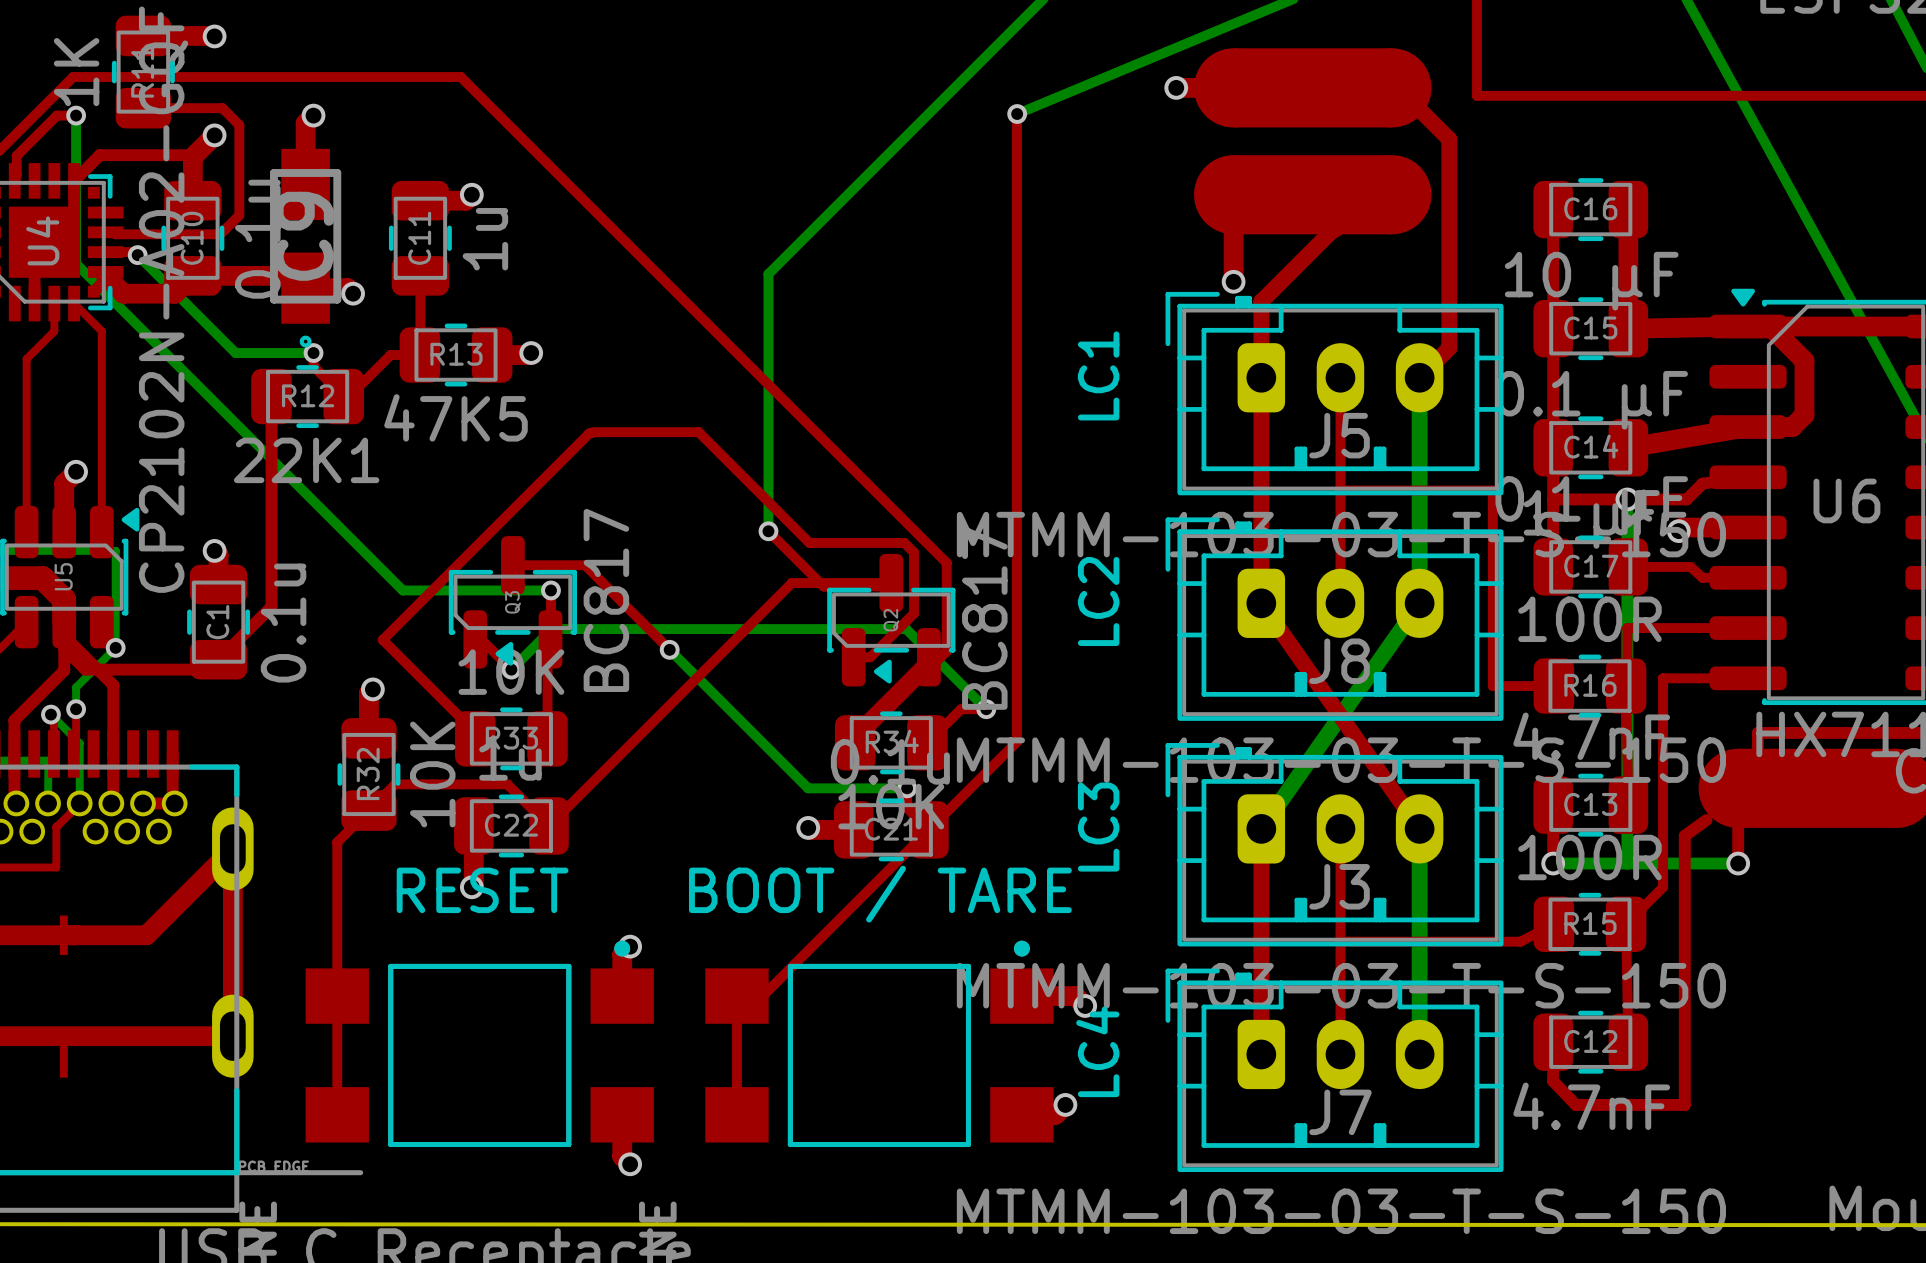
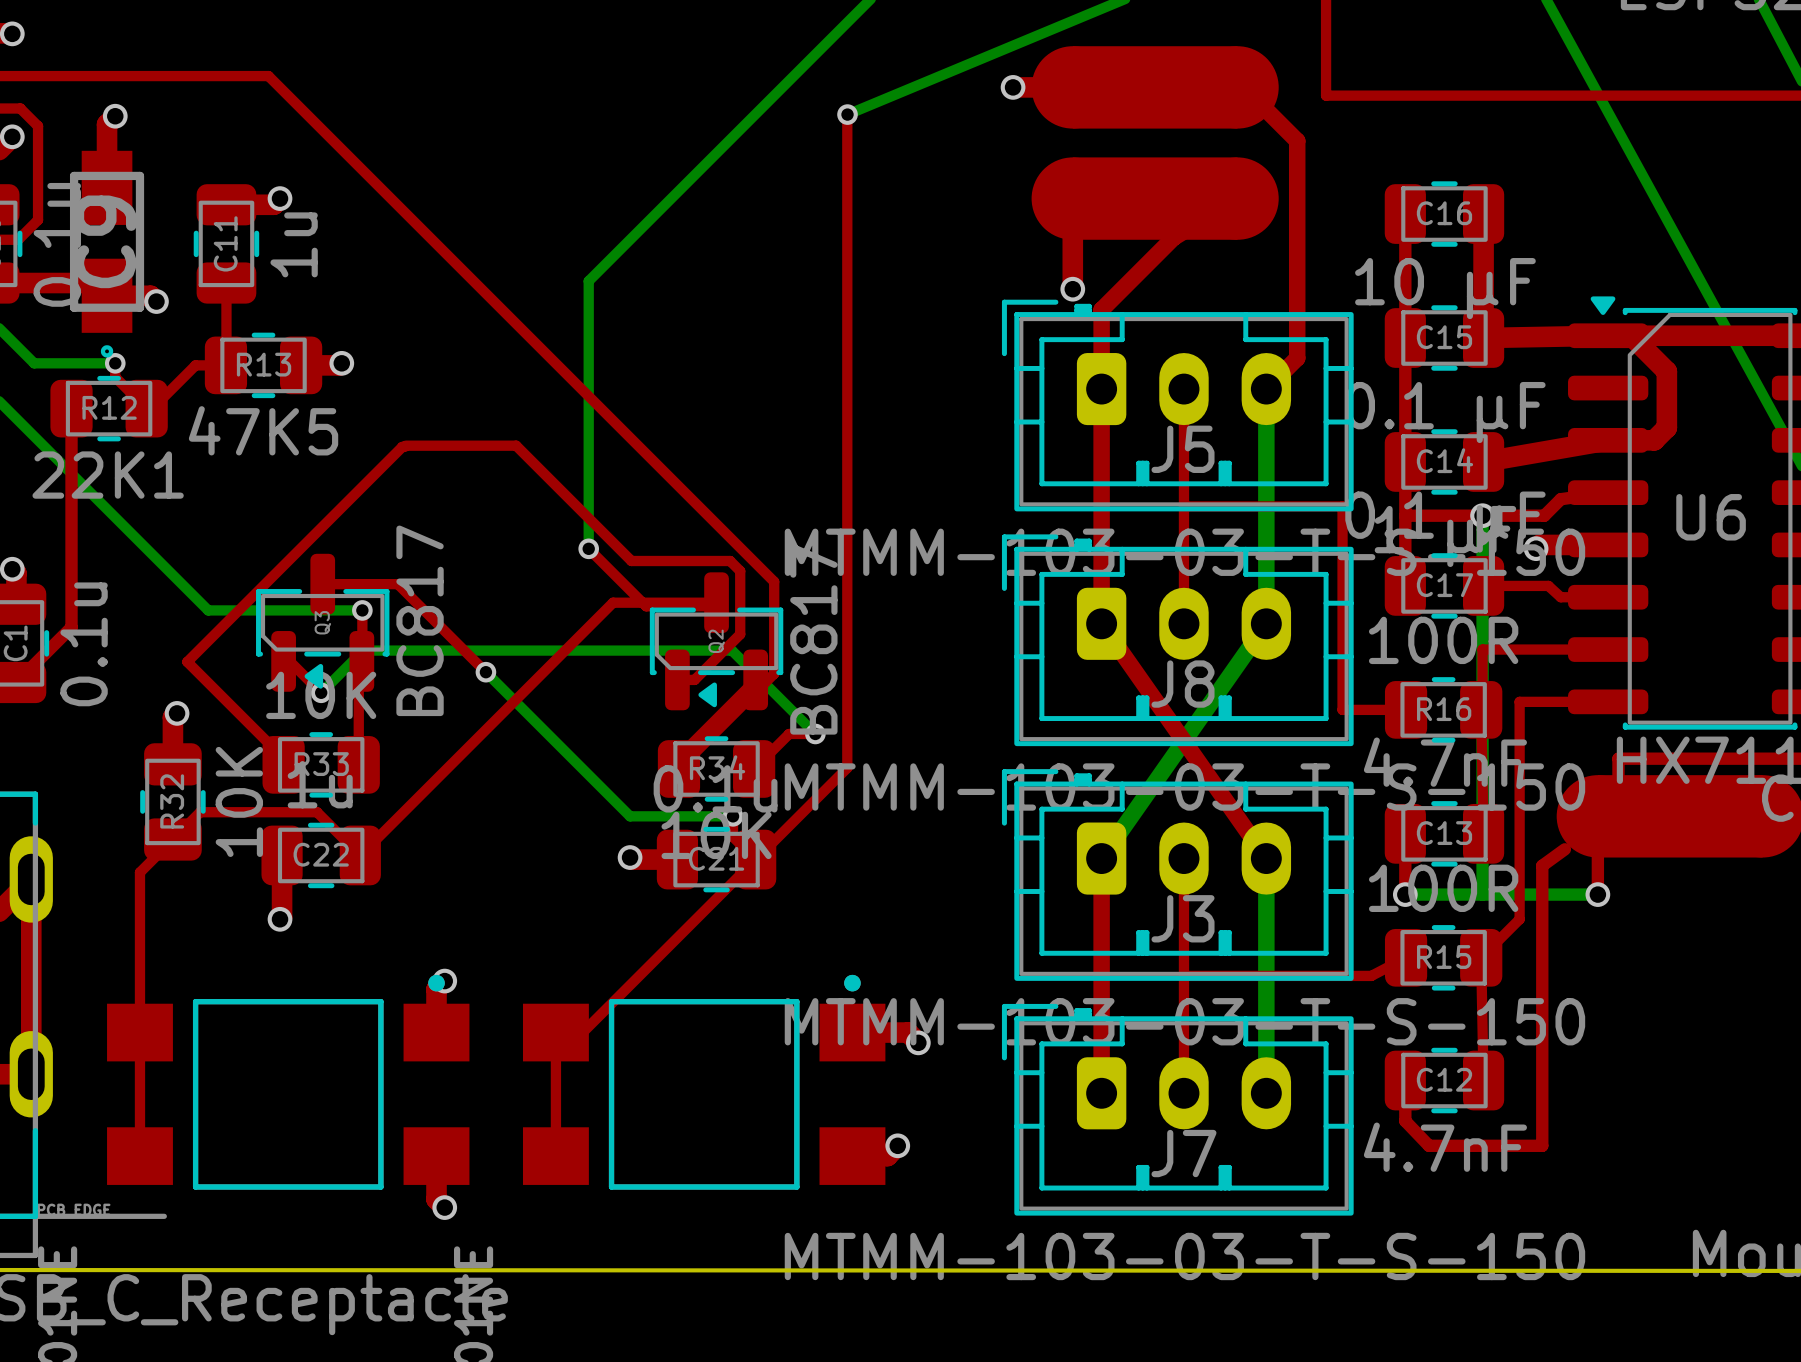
text: LC1 (1098, 375) -> none
text: LC2 (1098, 601) -> none
text: LC3 (1098, 827) -> none
text: RESET (482, 890) -> none
text: BOOT / TARE (880, 894) -> none
text: LC4 (1097, 1051) -> none

